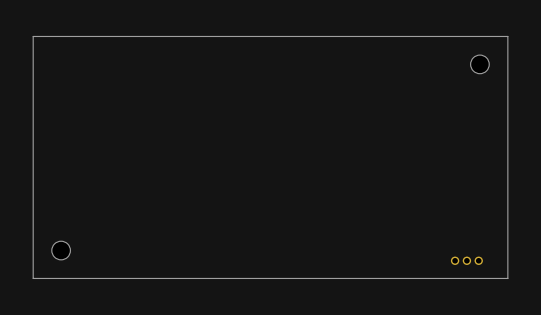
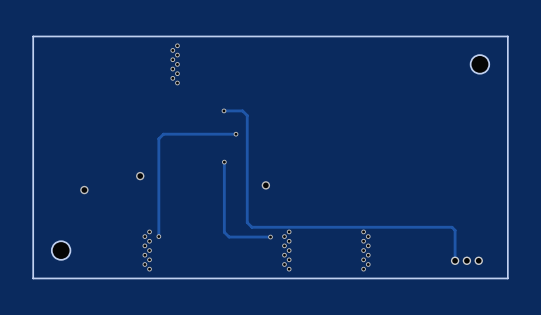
via: none -> (177, 45)
via: none -> (172, 50)
via: none -> (177, 55)
via: none -> (172, 59)
via: none -> (177, 64)
via: none -> (172, 69)
via: none -> (177, 73)
via: none -> (172, 78)
via: none -> (177, 83)
track: none -> (223, 110) (242, 110) (247, 115) (247, 222) (251, 227) (452, 227) (455, 230) (455, 260)
via: none -> (223, 110)
track: none -> (235, 134) (163, 134) (158, 138) (158, 236)
via: none -> (235, 134)
track: none -> (224, 162) (224, 232) (229, 237) (270, 237)
via: none -> (224, 162)
via: none -> (140, 176)
via: none -> (265, 185)
via: none -> (84, 190)
via: none -> (149, 231)
via: none -> (289, 231)
via: none -> (363, 231)
via: none -> (144, 236)
via: none -> (158, 236)
via: none -> (284, 236)
via: none -> (368, 236)
via: none -> (270, 237)
via: none -> (149, 241)
via: none -> (289, 241)
via: none -> (363, 241)
via: none -> (144, 245)
via: none -> (284, 245)
via: none -> (368, 245)
via: none -> (149, 250)
via: none -> (289, 250)
via: none -> (363, 250)
via: none -> (144, 255)
via: none -> (284, 255)
via: none -> (368, 255)
via: none -> (149, 259)
via: none -> (289, 259)
via: none -> (363, 259)
via: none -> (144, 264)
via: none -> (284, 264)
via: none -> (368, 264)
via: none -> (149, 269)
via: none -> (289, 269)
via: none -> (363, 269)

